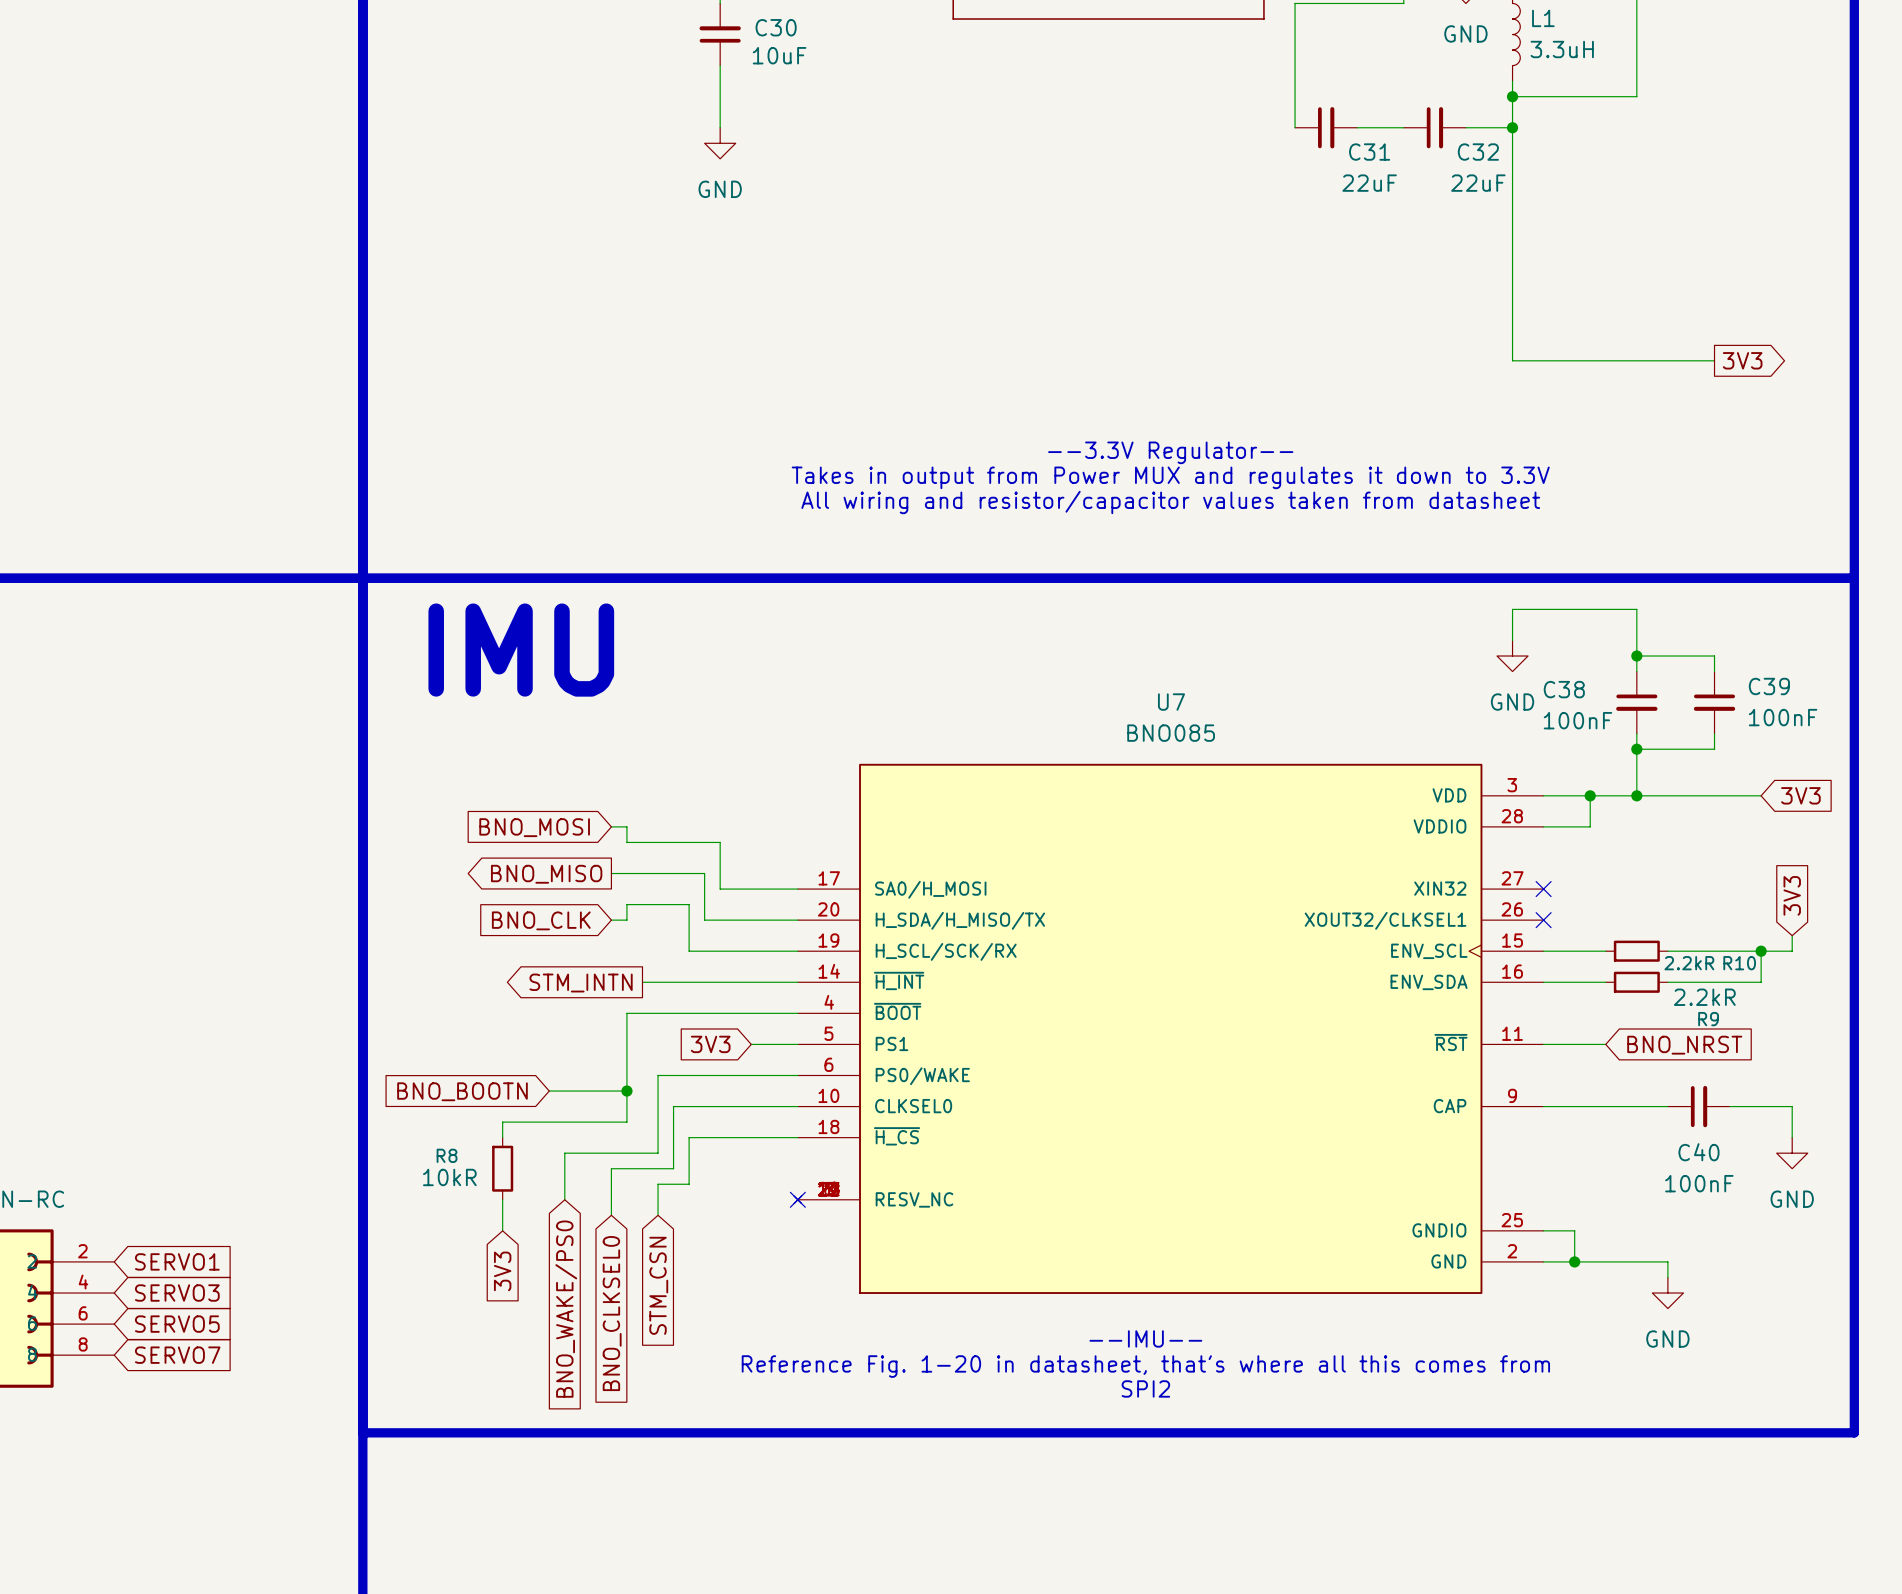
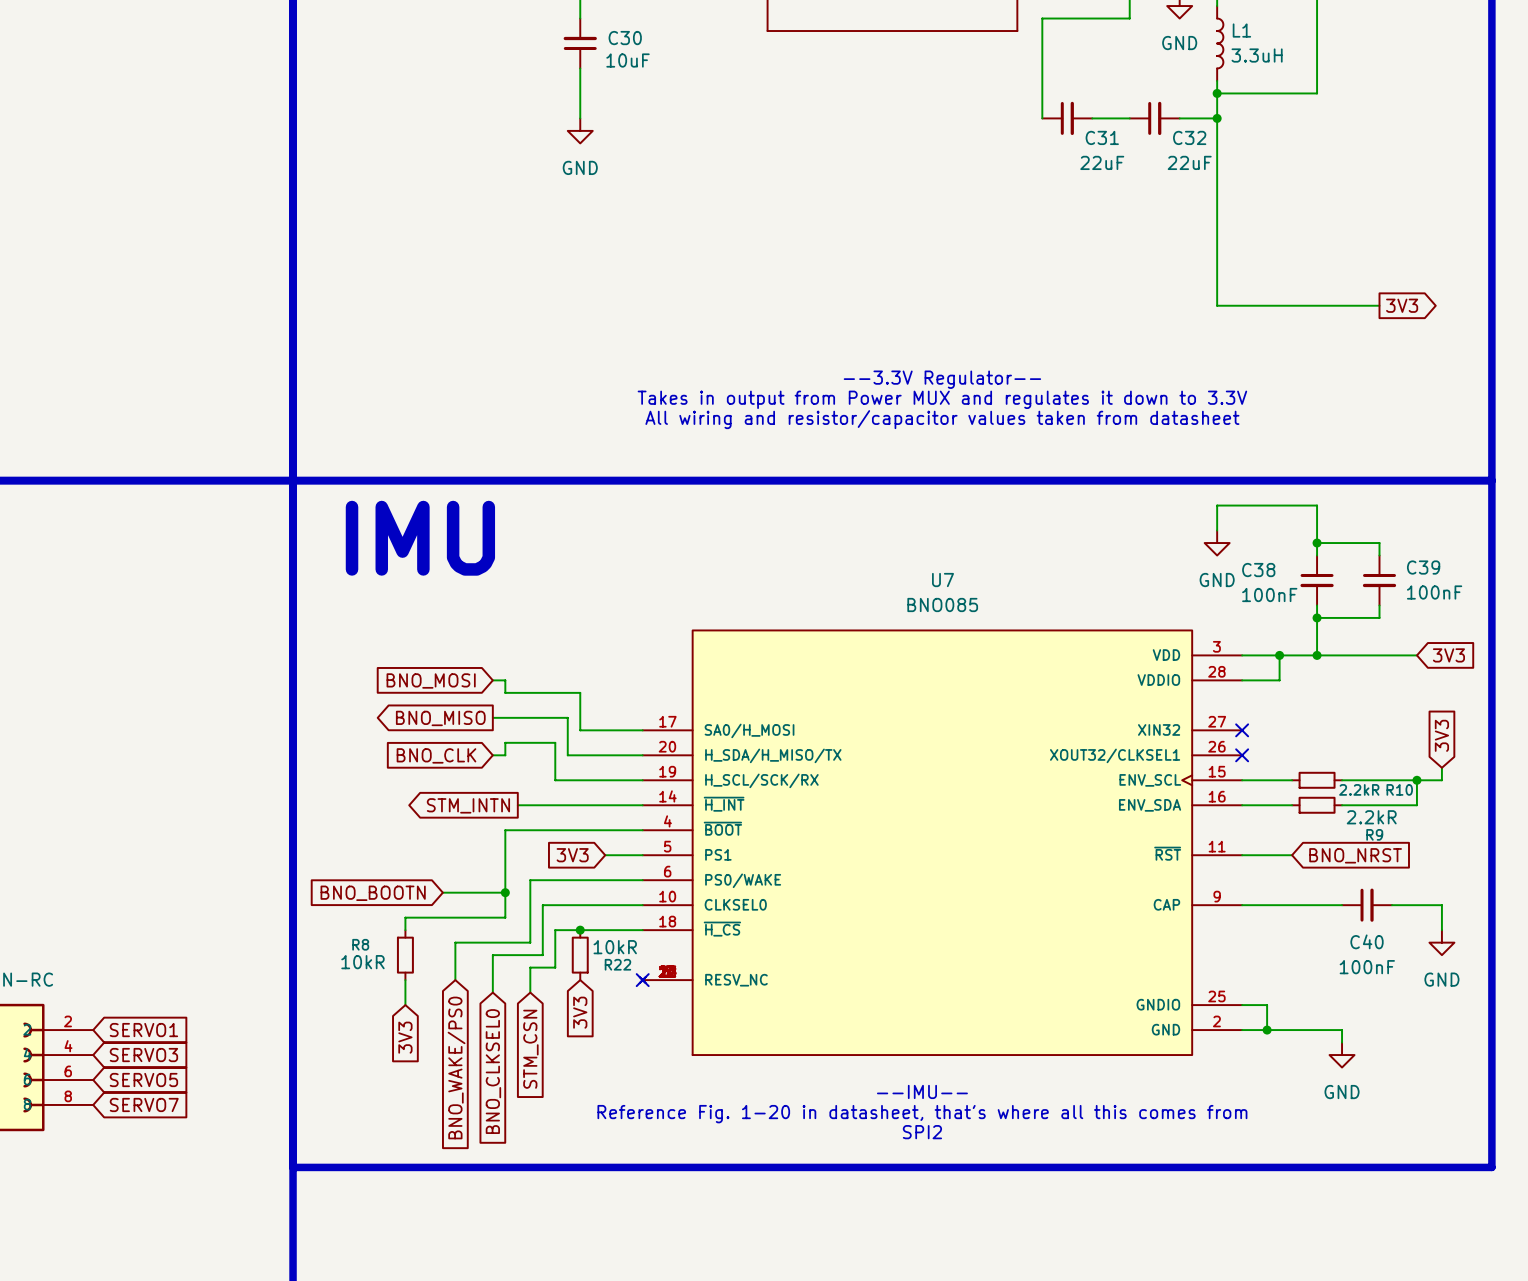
junction: none -> (580, 930)
R22: none -> 10kR (580, 955)
global label: none -> 3V3 (580, 1012)

